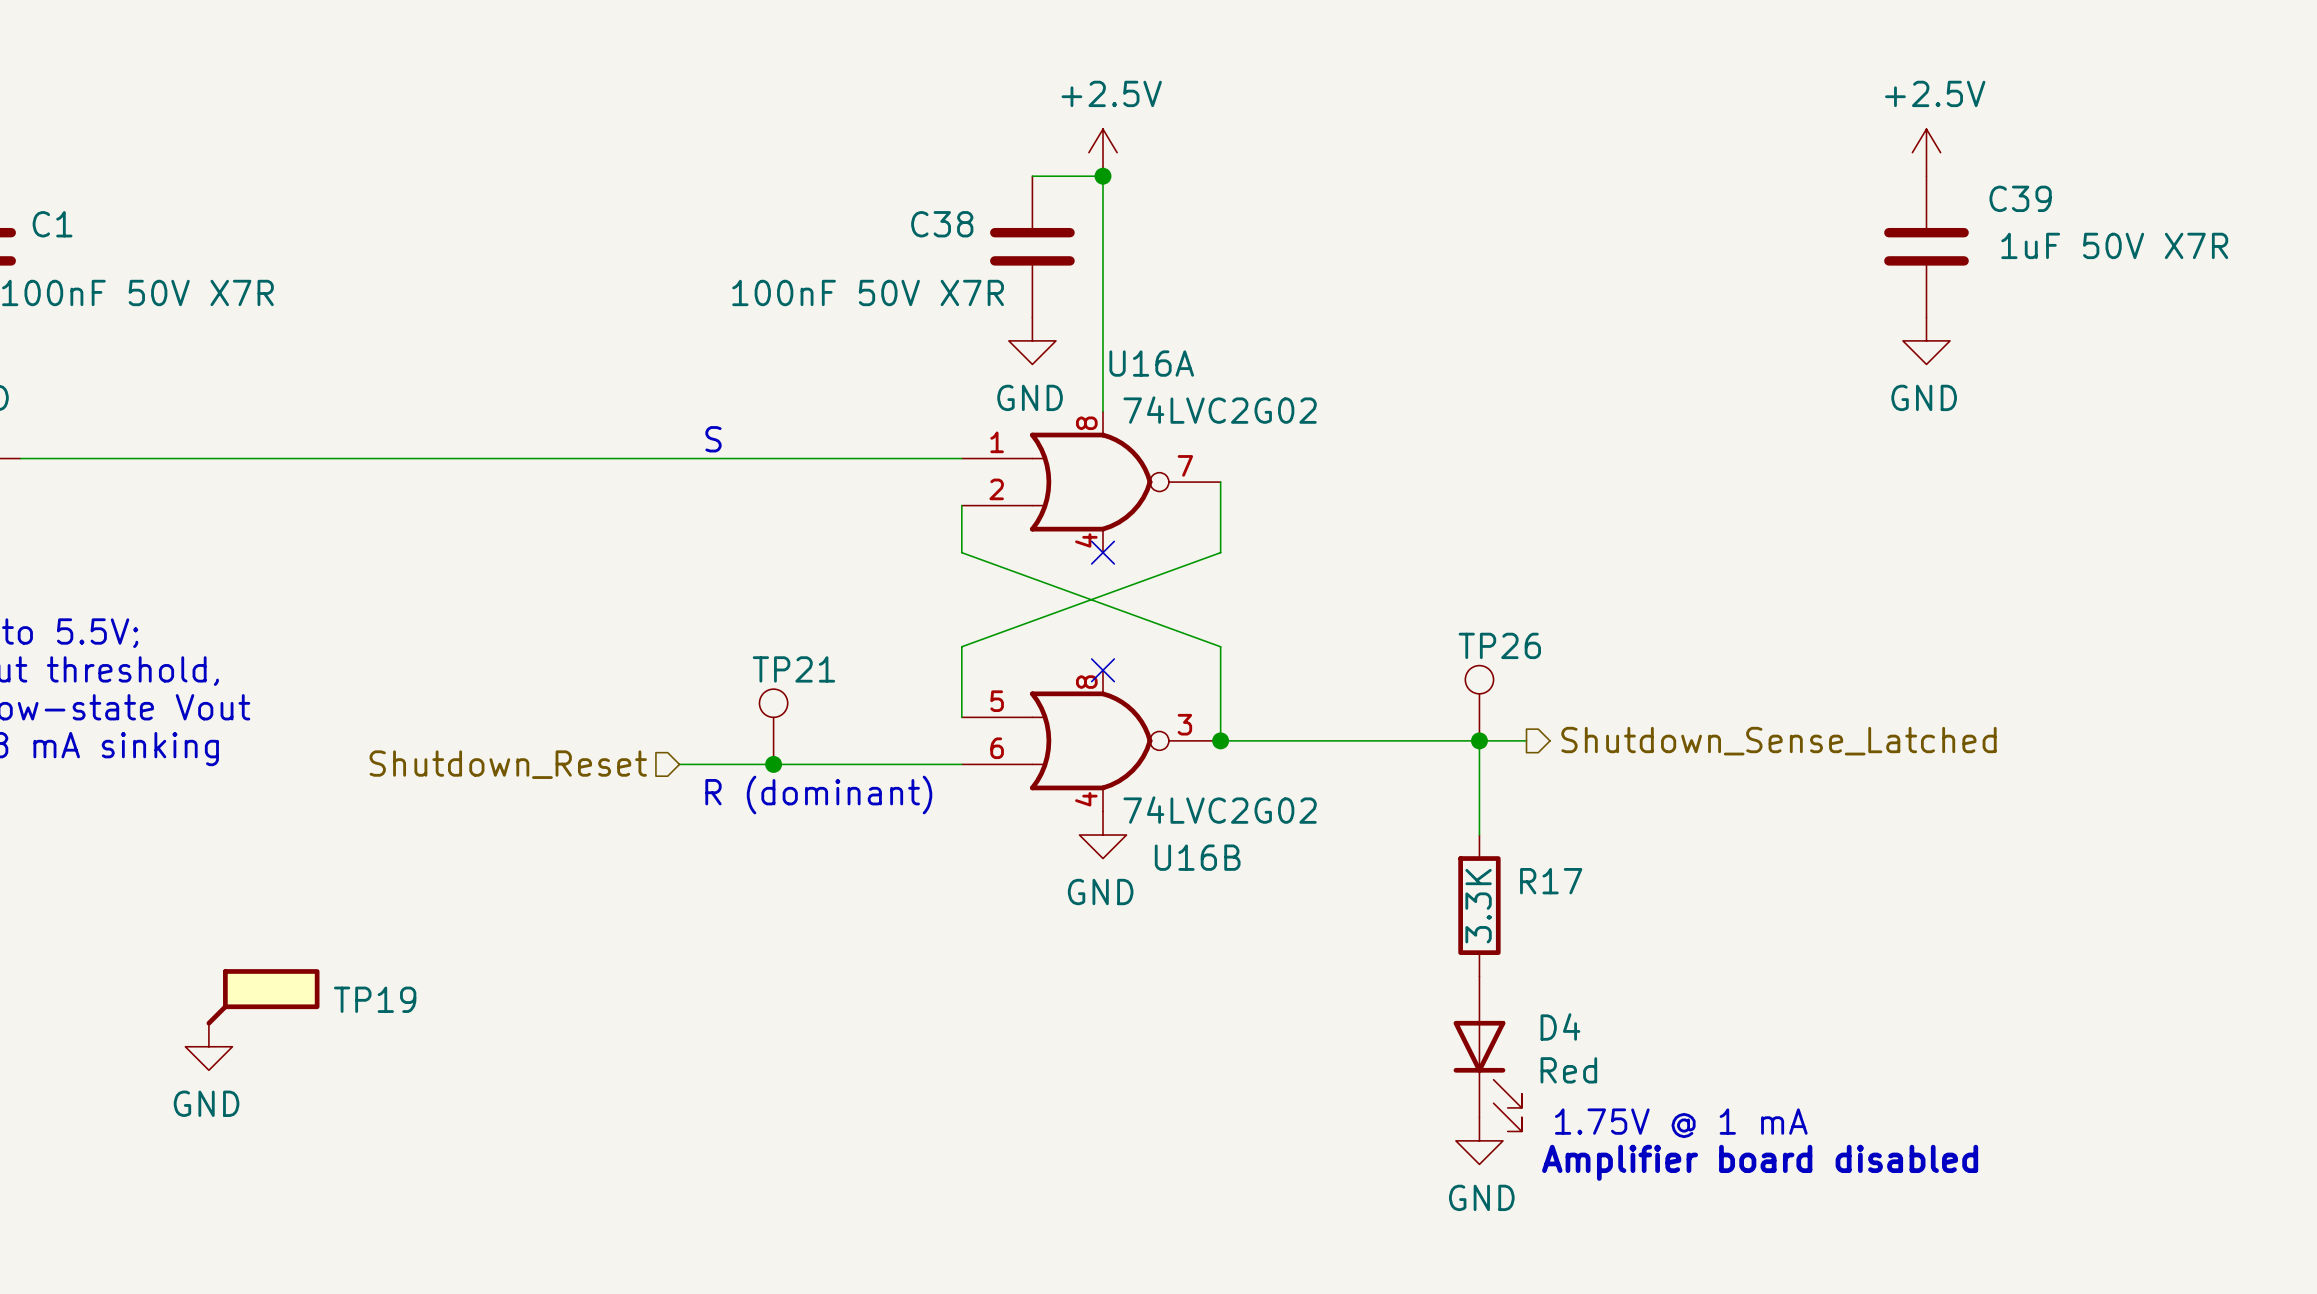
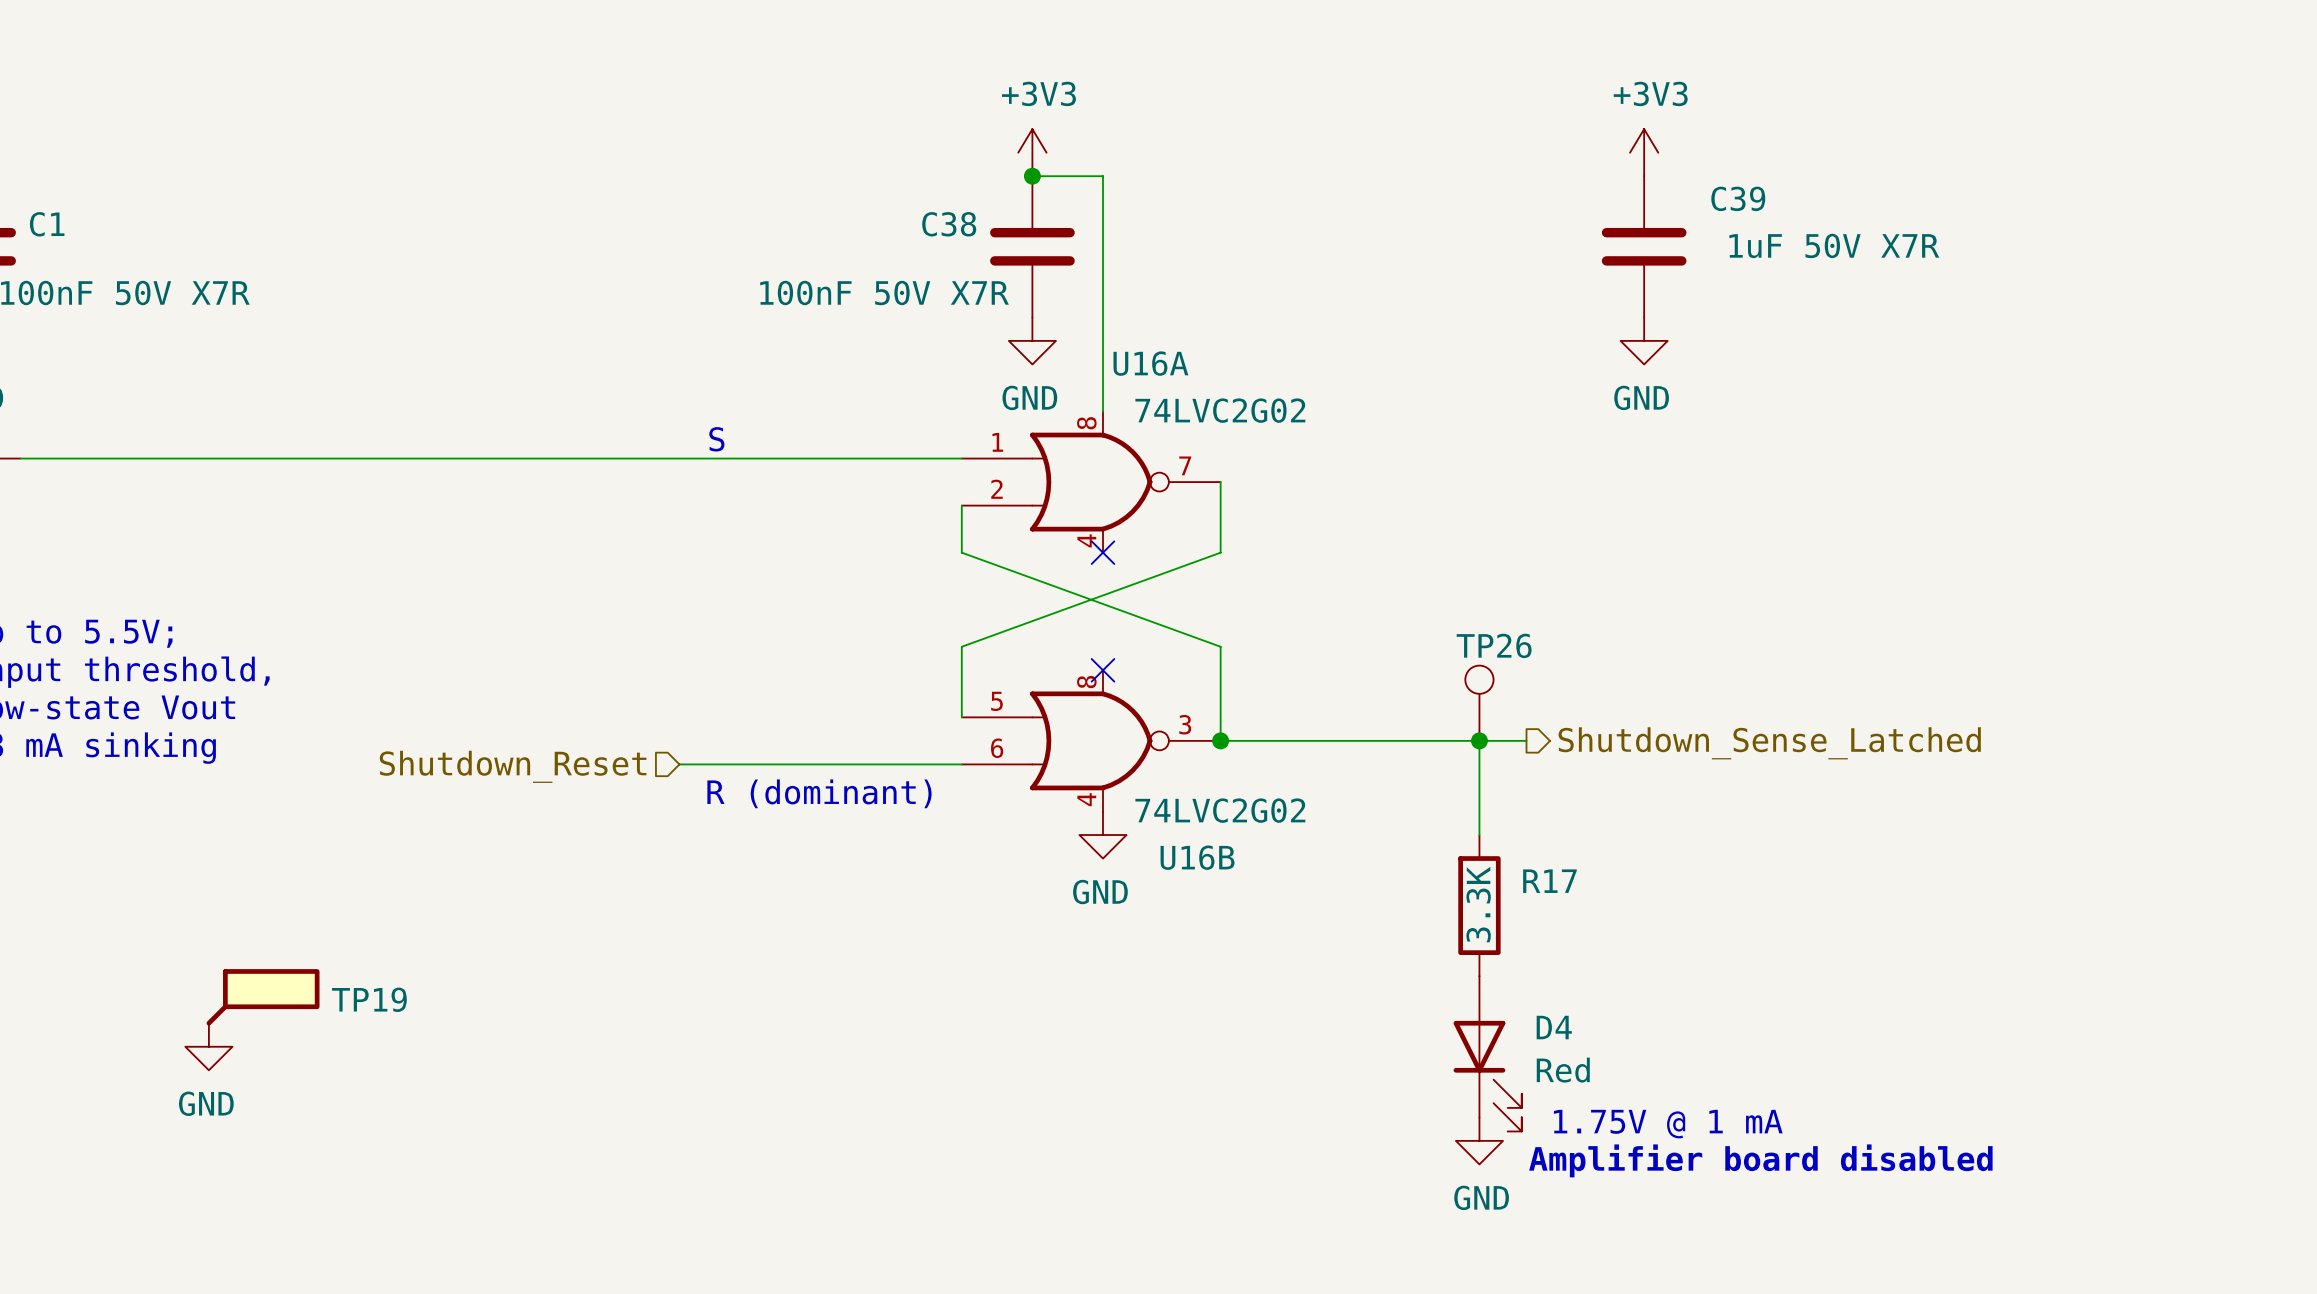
power symbol: none -> +3V3 (1032, 152)
power symbol: +2.5V (1102, 152) -> none
power symbol: none -> +3V3 (1644, 152)
power symbol: +2.5V (1926, 152) -> none
junction position: (1102, 176) -> (1032, 176)
C39 position: (1926, 246) -> (1644, 246)
power symbol position: GND (1926, 340) -> GND (1644, 340)
TP21: (773, 726) -> none
junction: (773, 764) -> none

